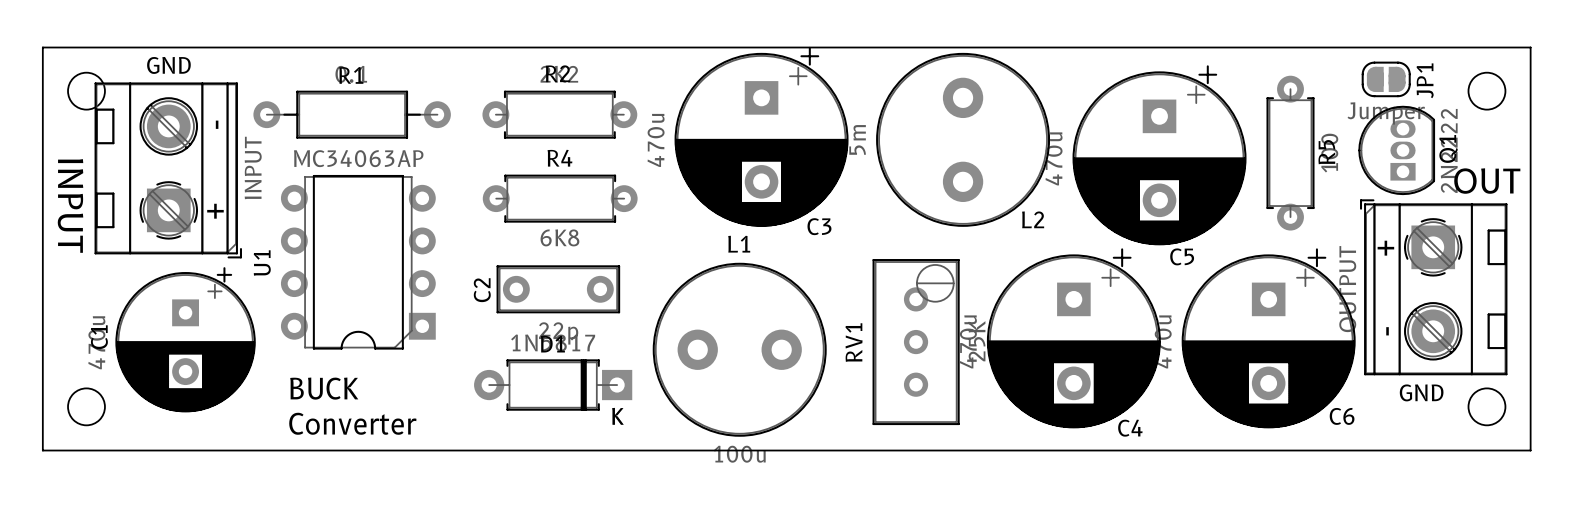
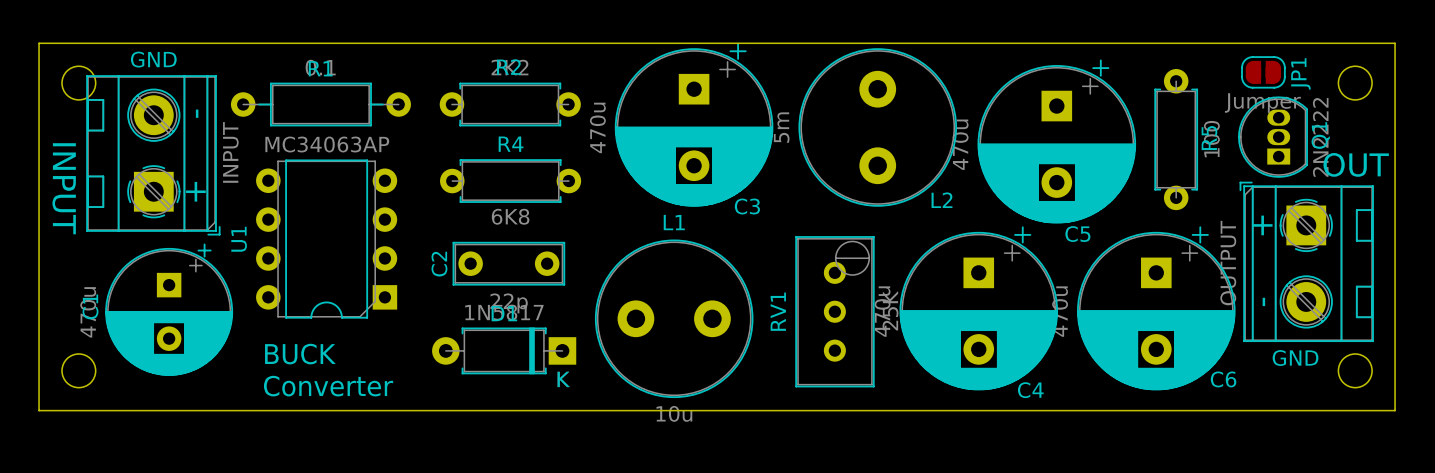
L1 value: 100u (739, 454) -> 10u (674, 413)

